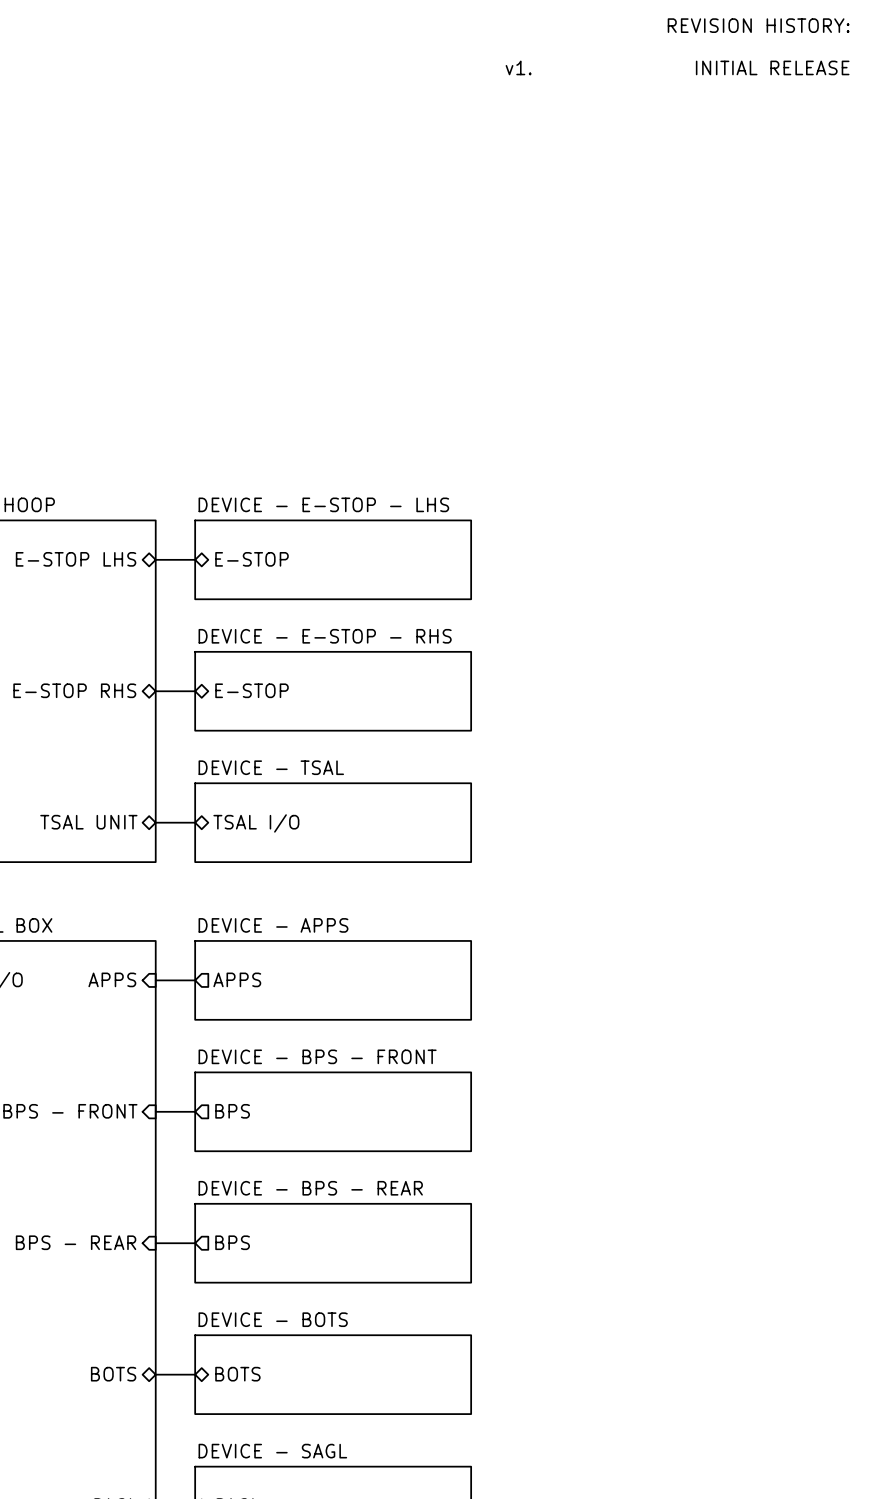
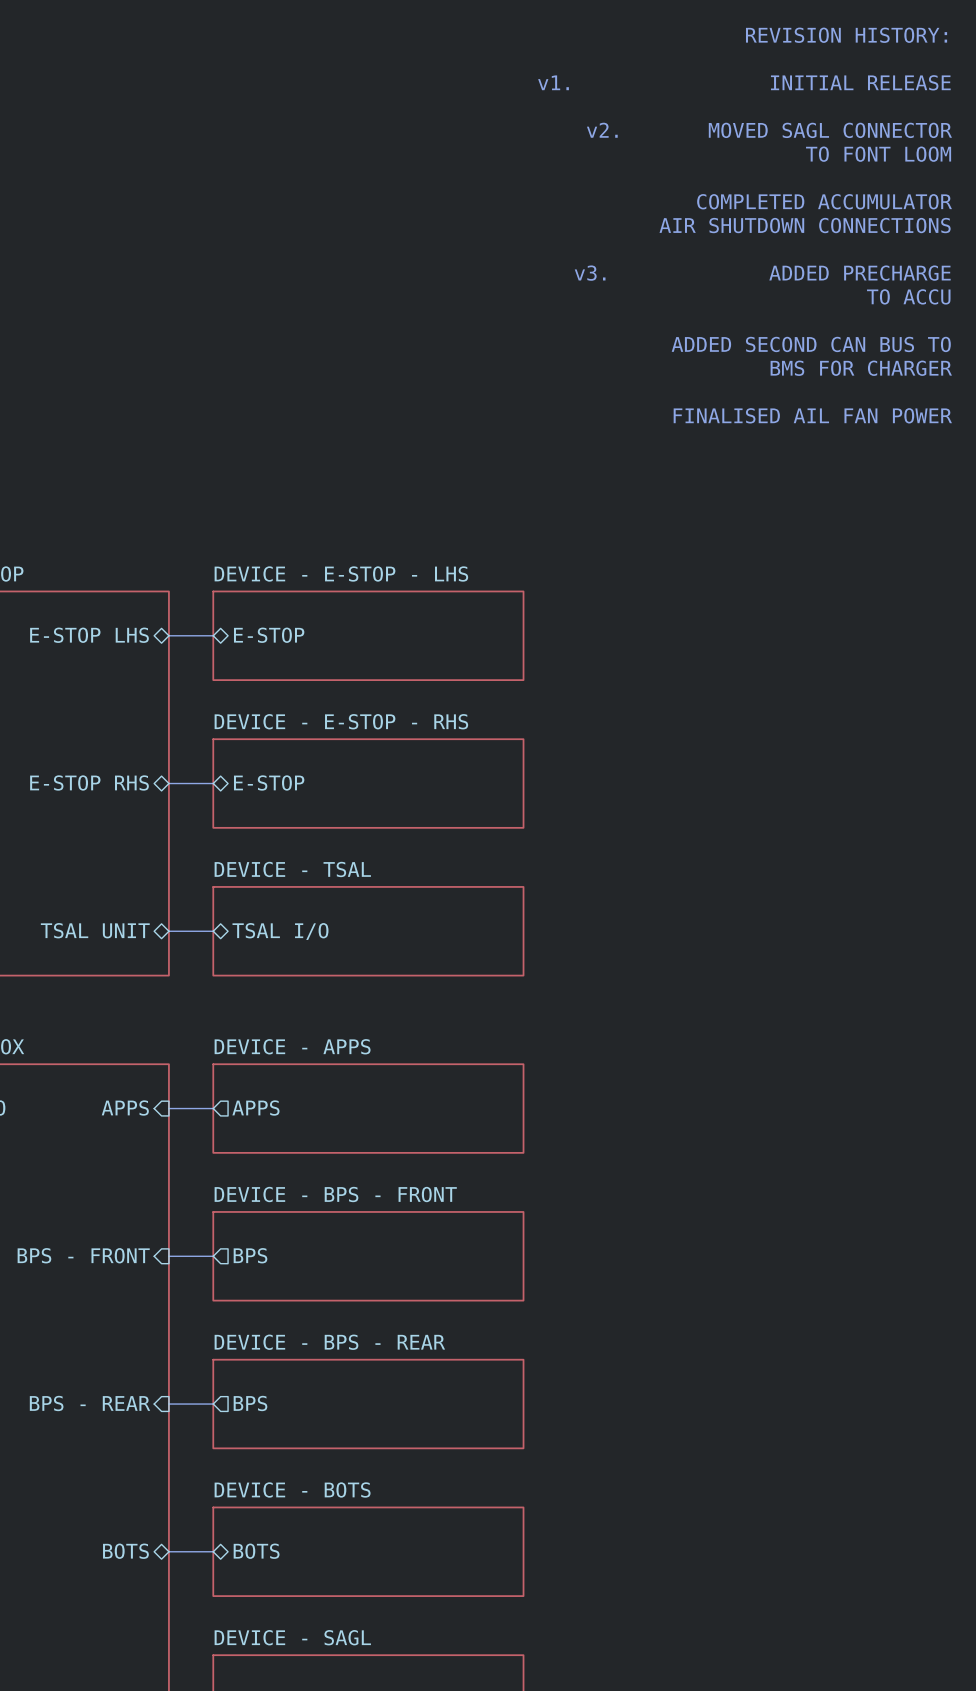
text: none -> v2. MOVED SAGL CONNECTOR (769, 130)
text: none -> TO FONT LOOM (878, 154)
text: none -> COMPLETED ACCUMULATOR (824, 201)
text: none -> AIR SHUTDOWN CONNECTIONS (805, 225)
text: none -> v3. ADDED PRECHARGE (762, 273)
text: none -> TO ACCU (908, 296)
text: none -> ADDED SECOND CAN BUS TO (811, 344)
text: none -> BMS FOR CHARGER (861, 368)
text: none -> FINALISED AIL FAN POWER (812, 415)

